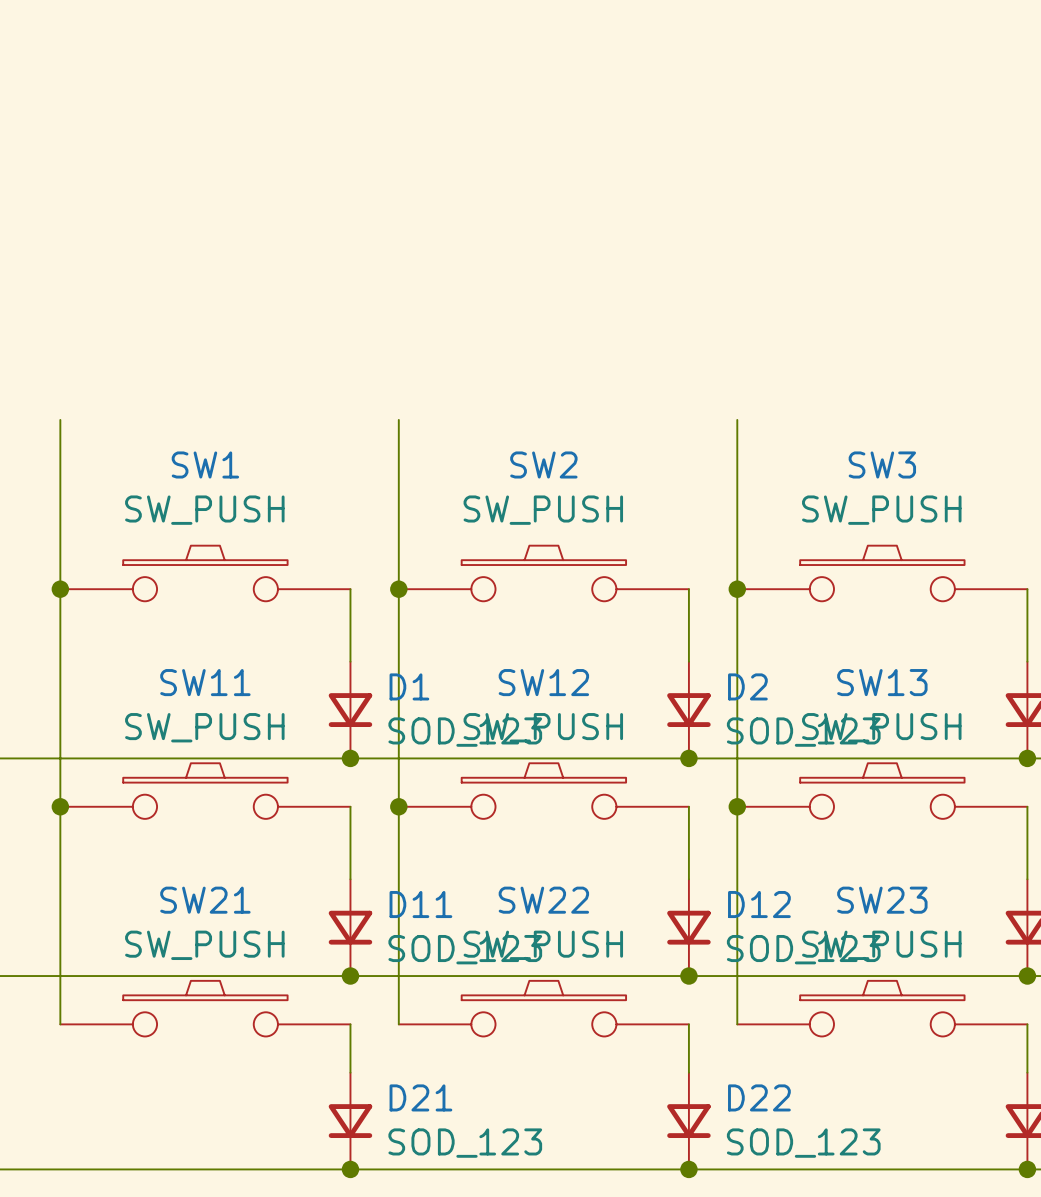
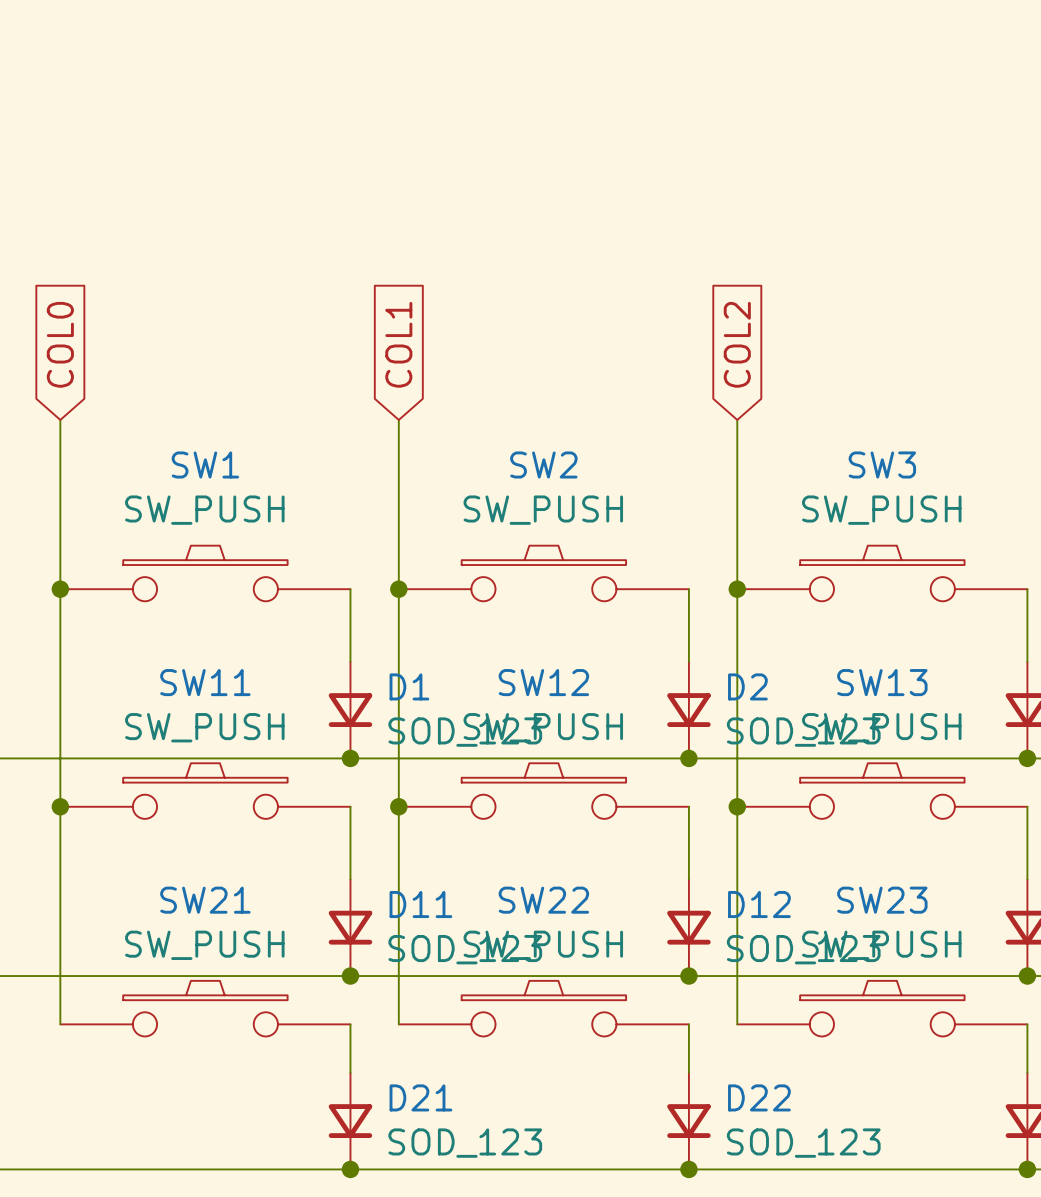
global label: none -> COL0 (60, 344)
global label: none -> COL1 (398, 344)
global label: none -> COL2 (737, 344)

